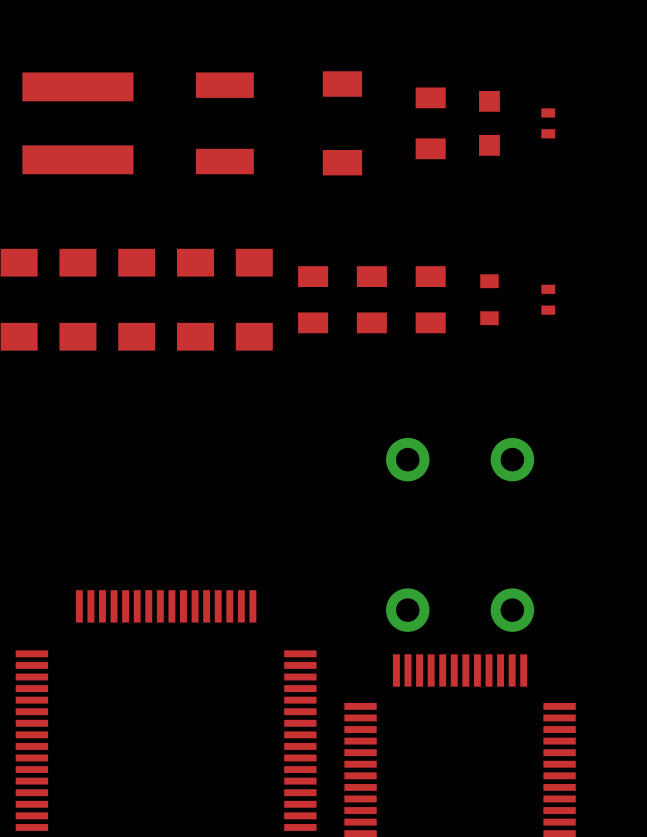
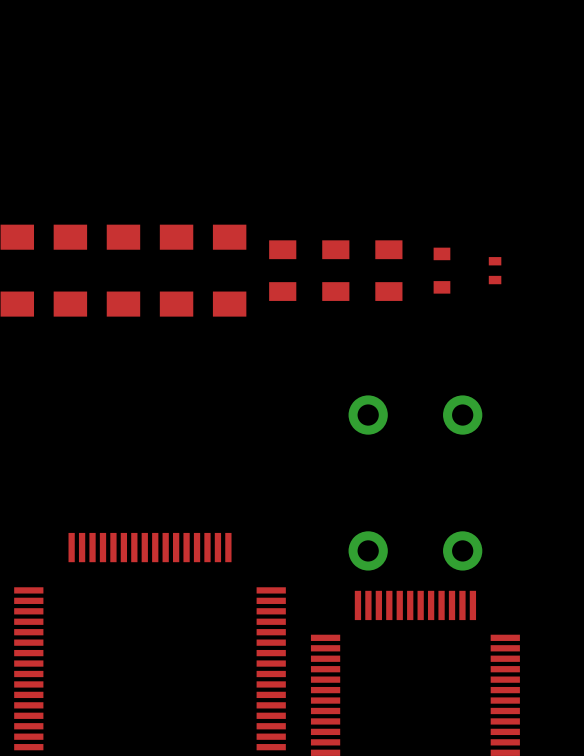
part: (77, 123) -> none
part: (224, 123) -> none
part: (342, 123) -> none
part: (430, 123) -> none
part: (489, 123) -> none
part: (548, 123) -> none

